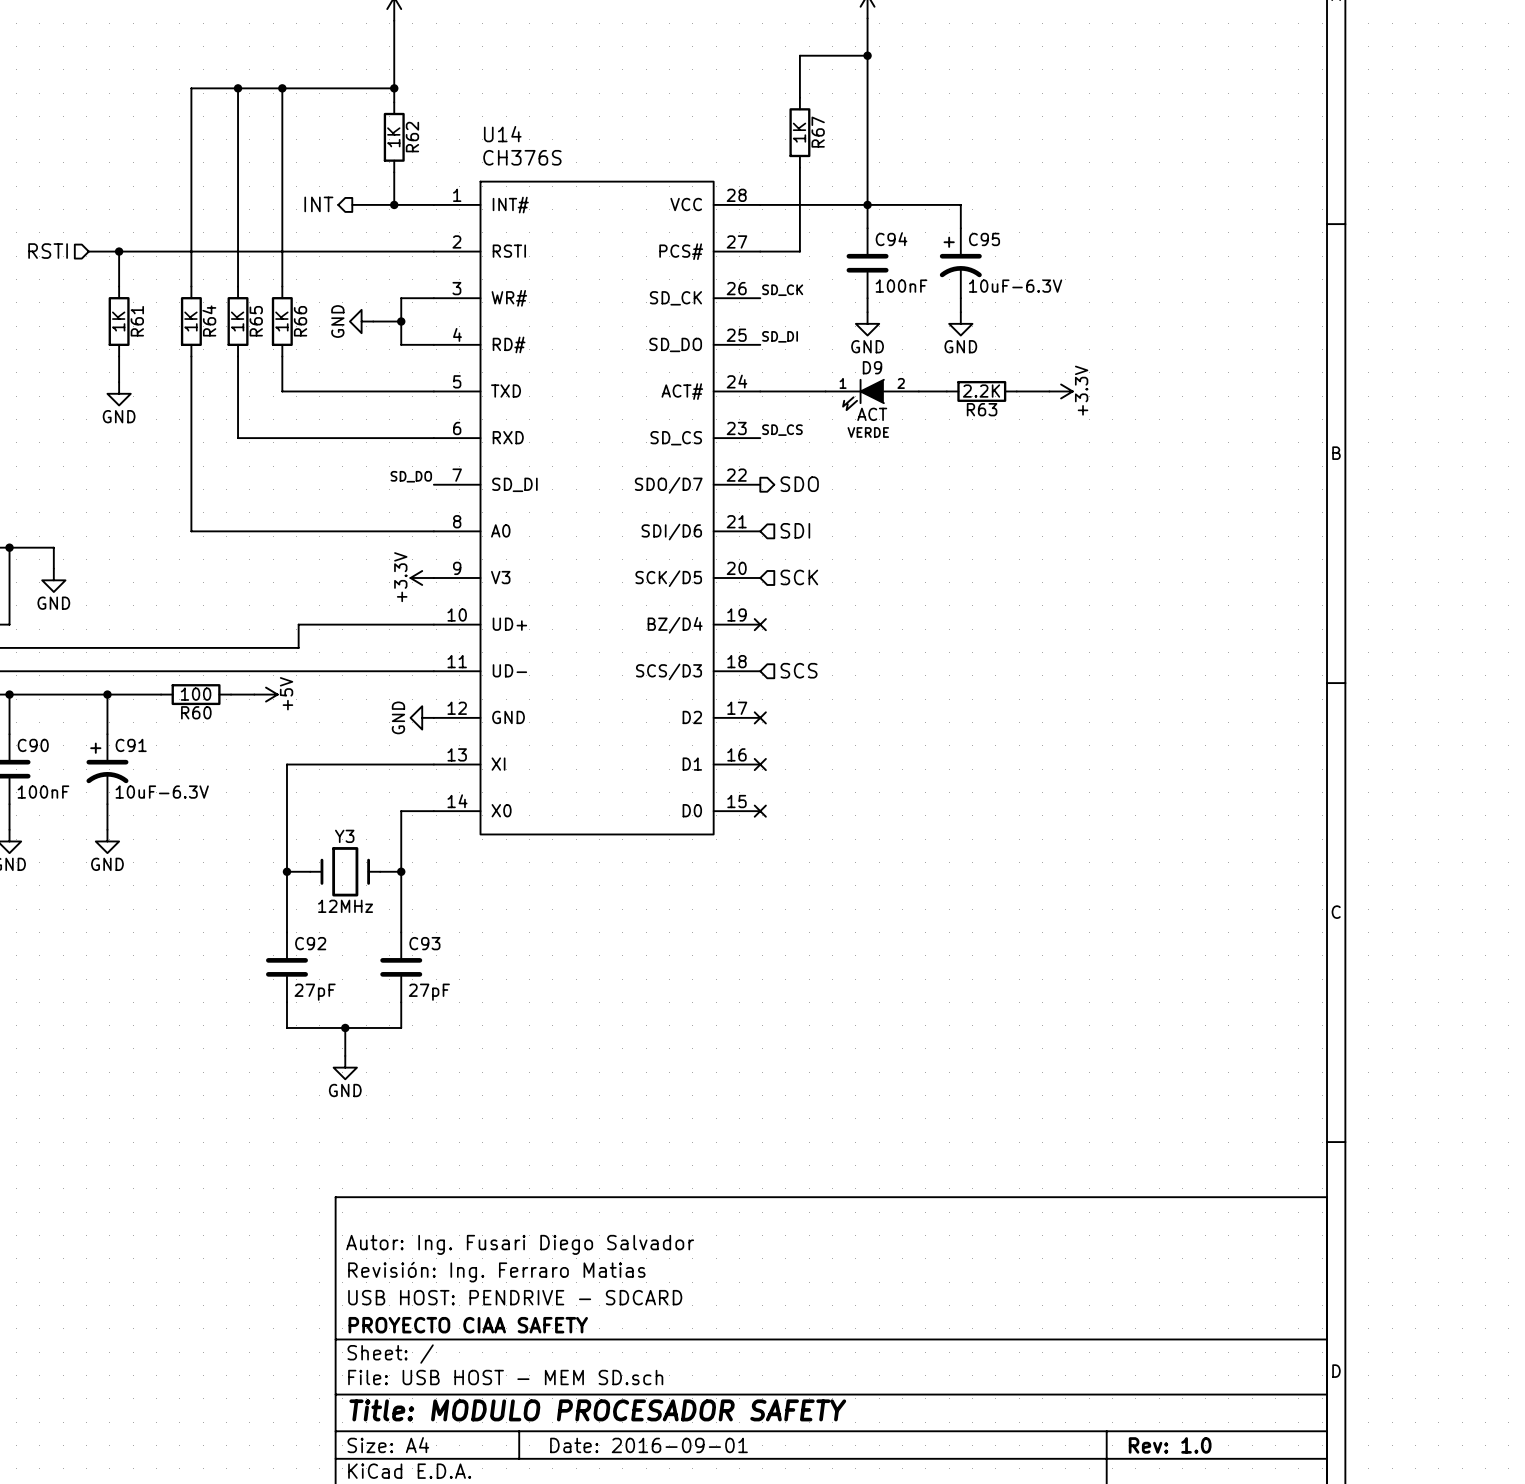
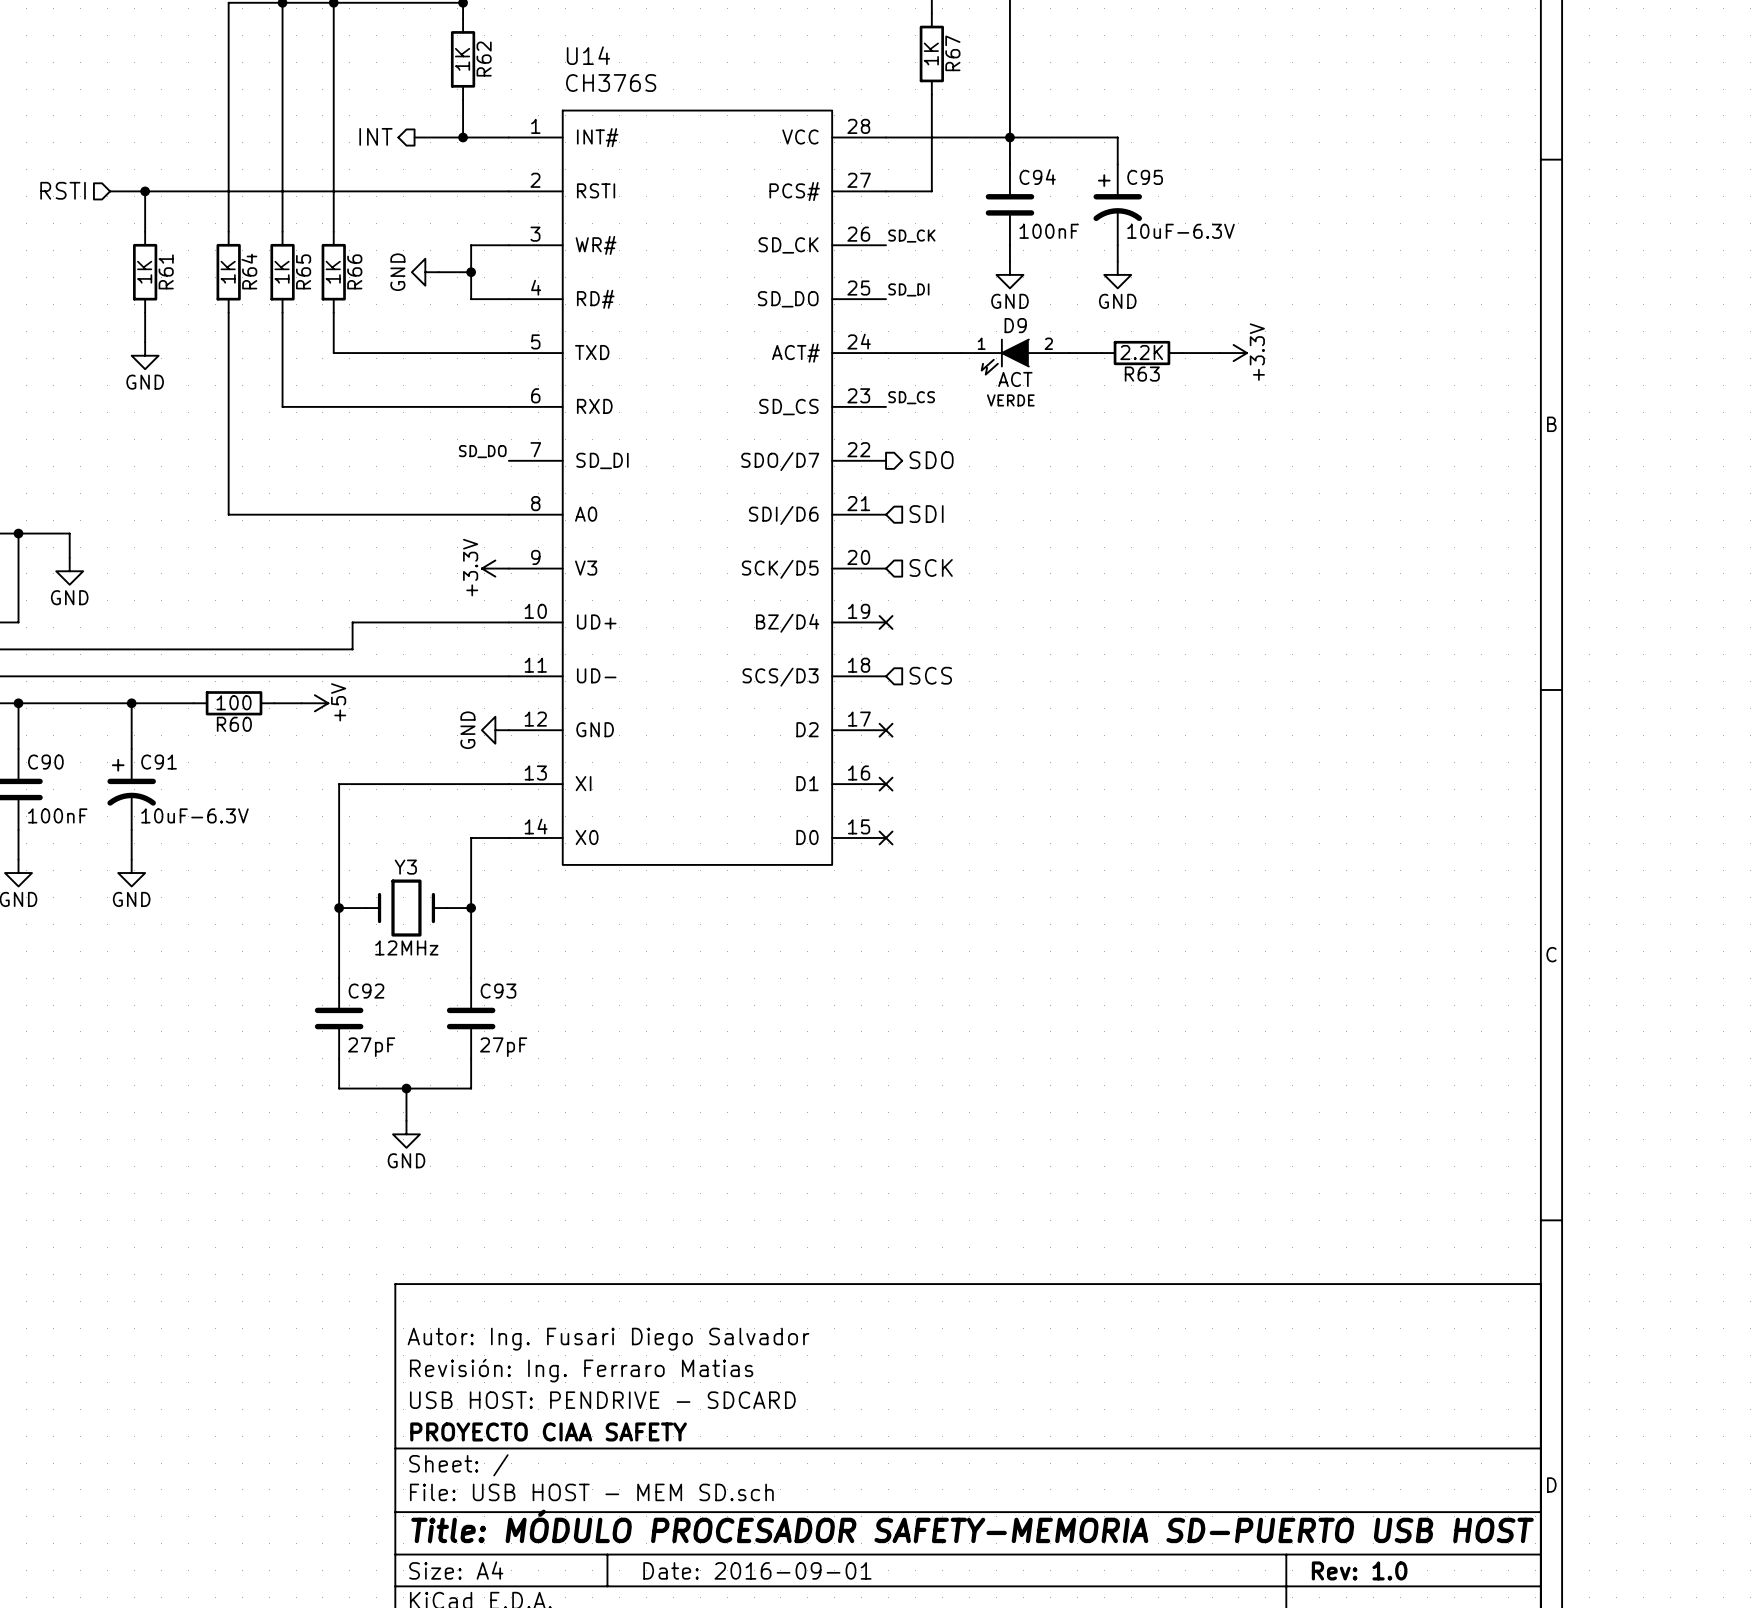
title block: Title: MODULO PROCESADOR SAFETY (597, 1410) -> Title: MÓDULO PROCESADOR SAFETY-MEMORIA SD-PUERTO USB HOST (972, 1526)

